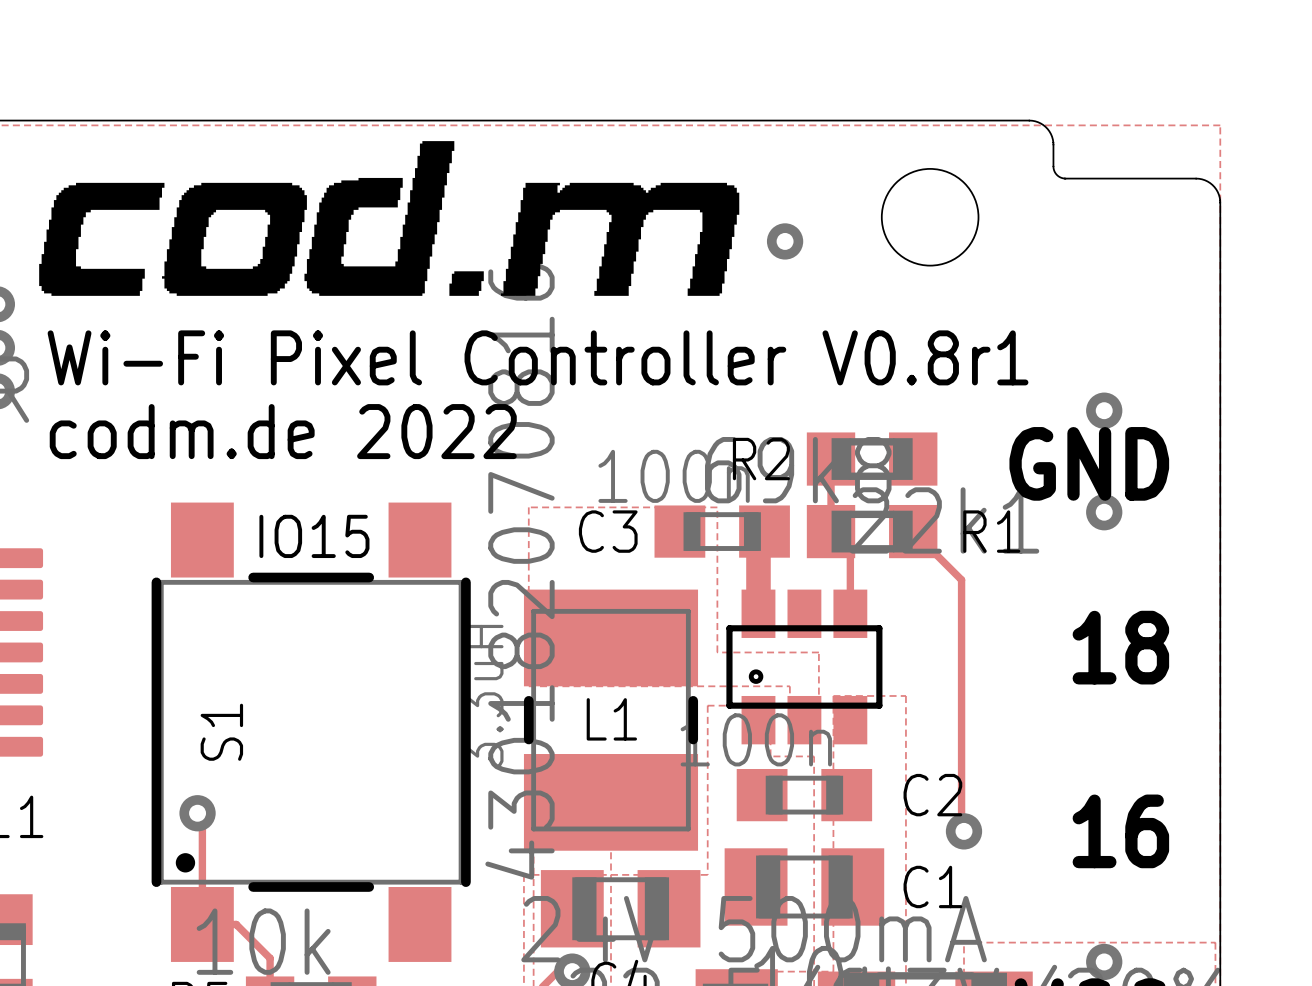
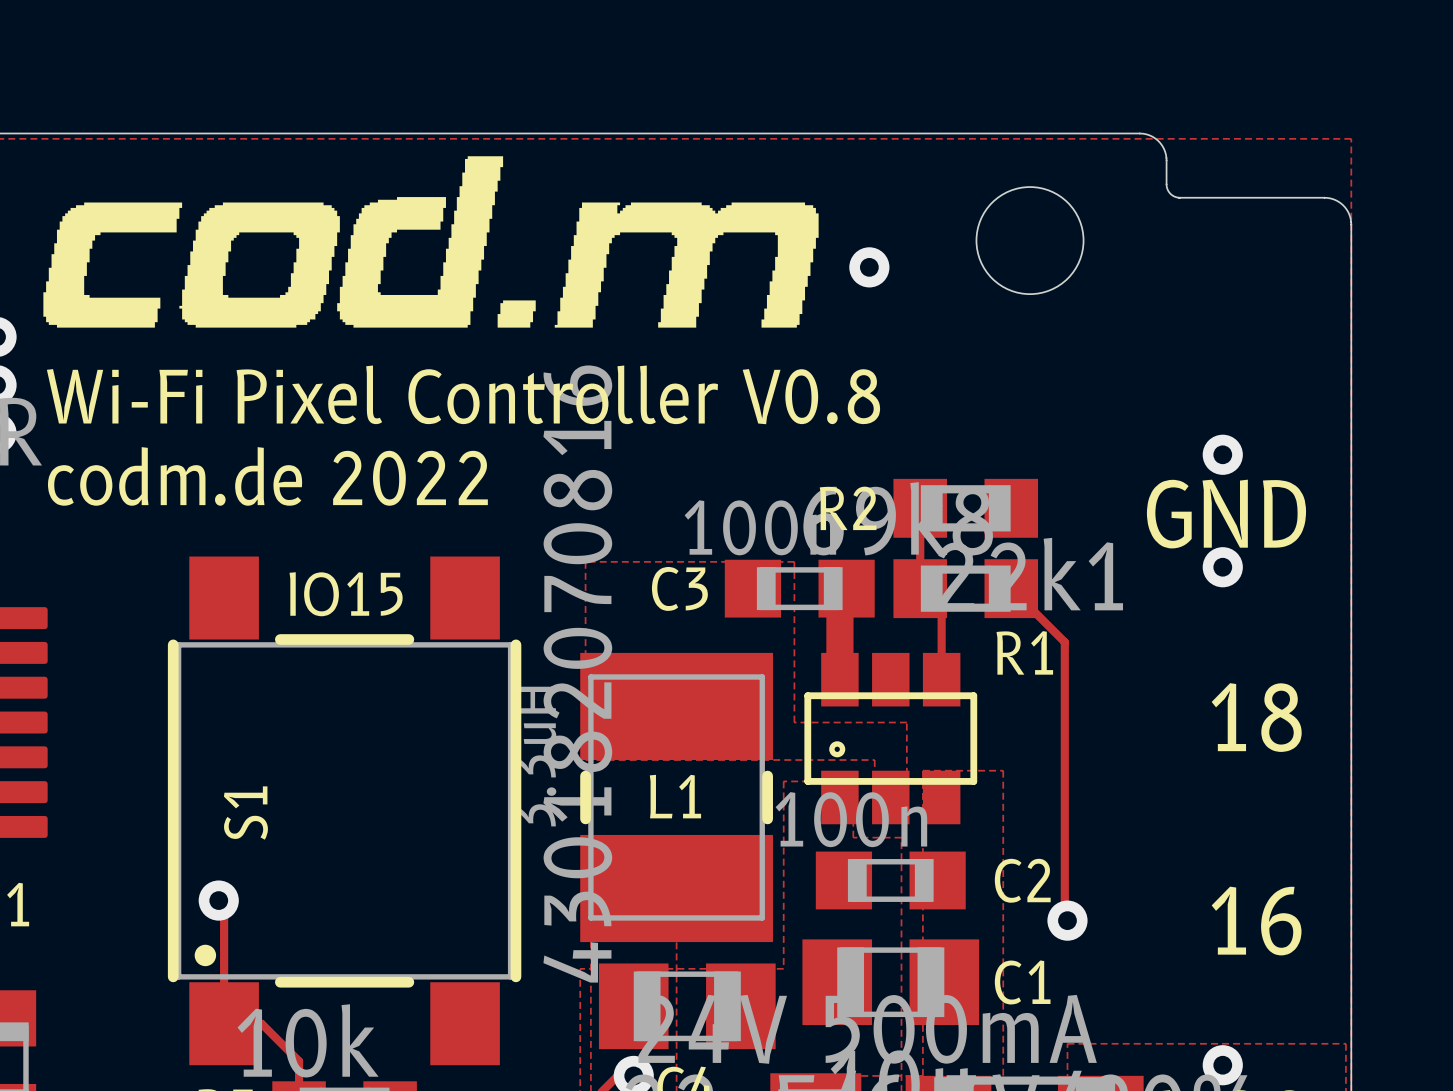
text: Wi-Fi Pixel Controller V0.8r1 (538, 357) -> Wi-Fi Pixel Controller V0.8 (463, 394)
R1 name position: R1 (991, 531) -> R1 (1024, 652)

